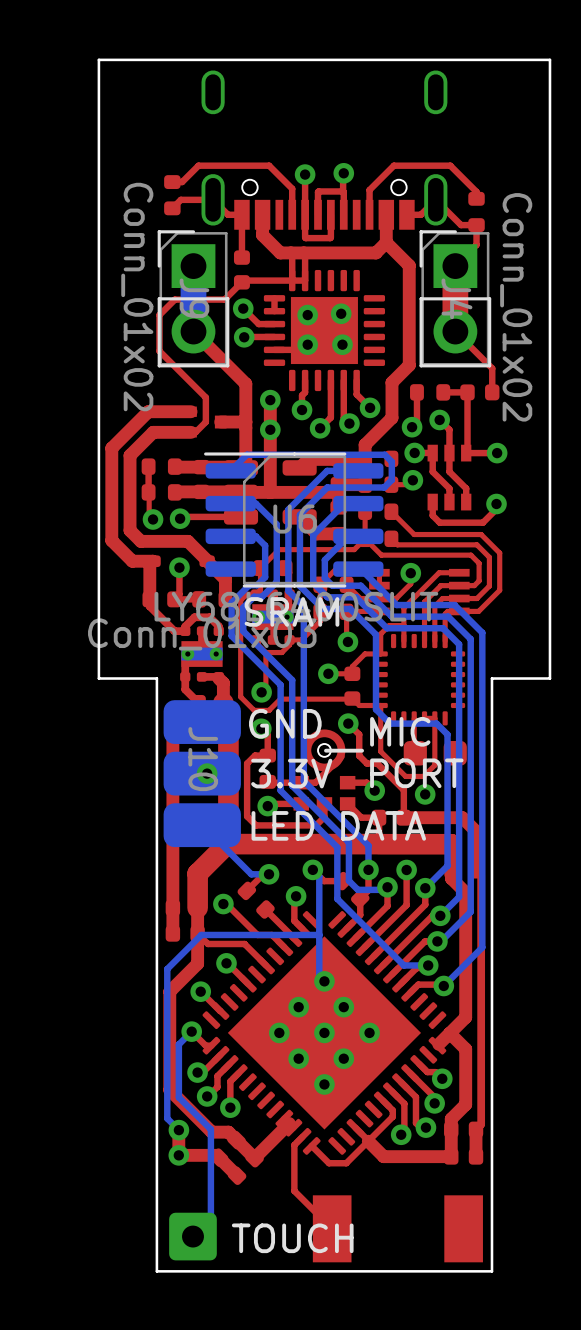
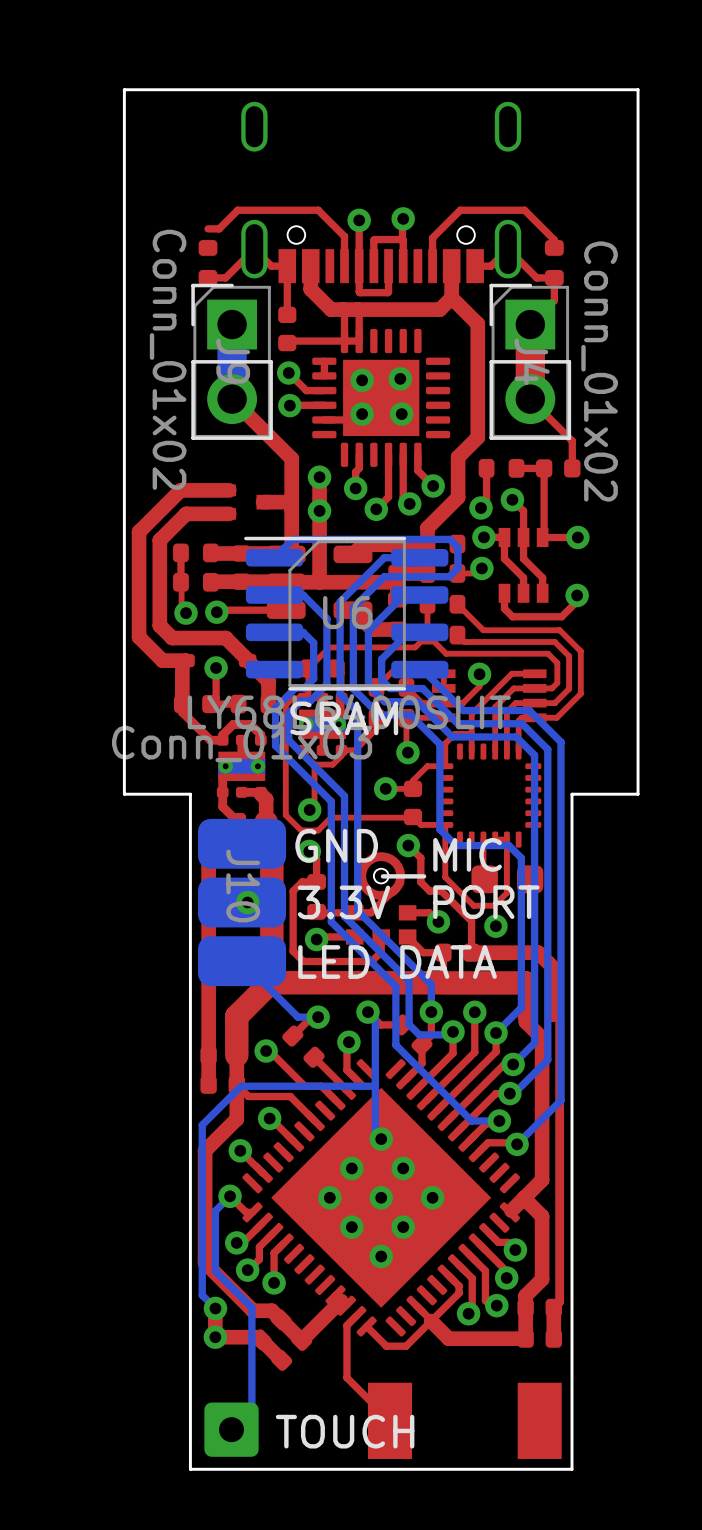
part position: (172, 195) -> (208, 262)
top track: (213, 199) (180, 199) (172, 208) -> (254, 249) (225, 277) (208, 277)
top track: (241, 282) (224, 299) (174, 299) (159, 315) (159, 351) (205, 397) (205, 422) (195, 432) (191, 432) -> none

